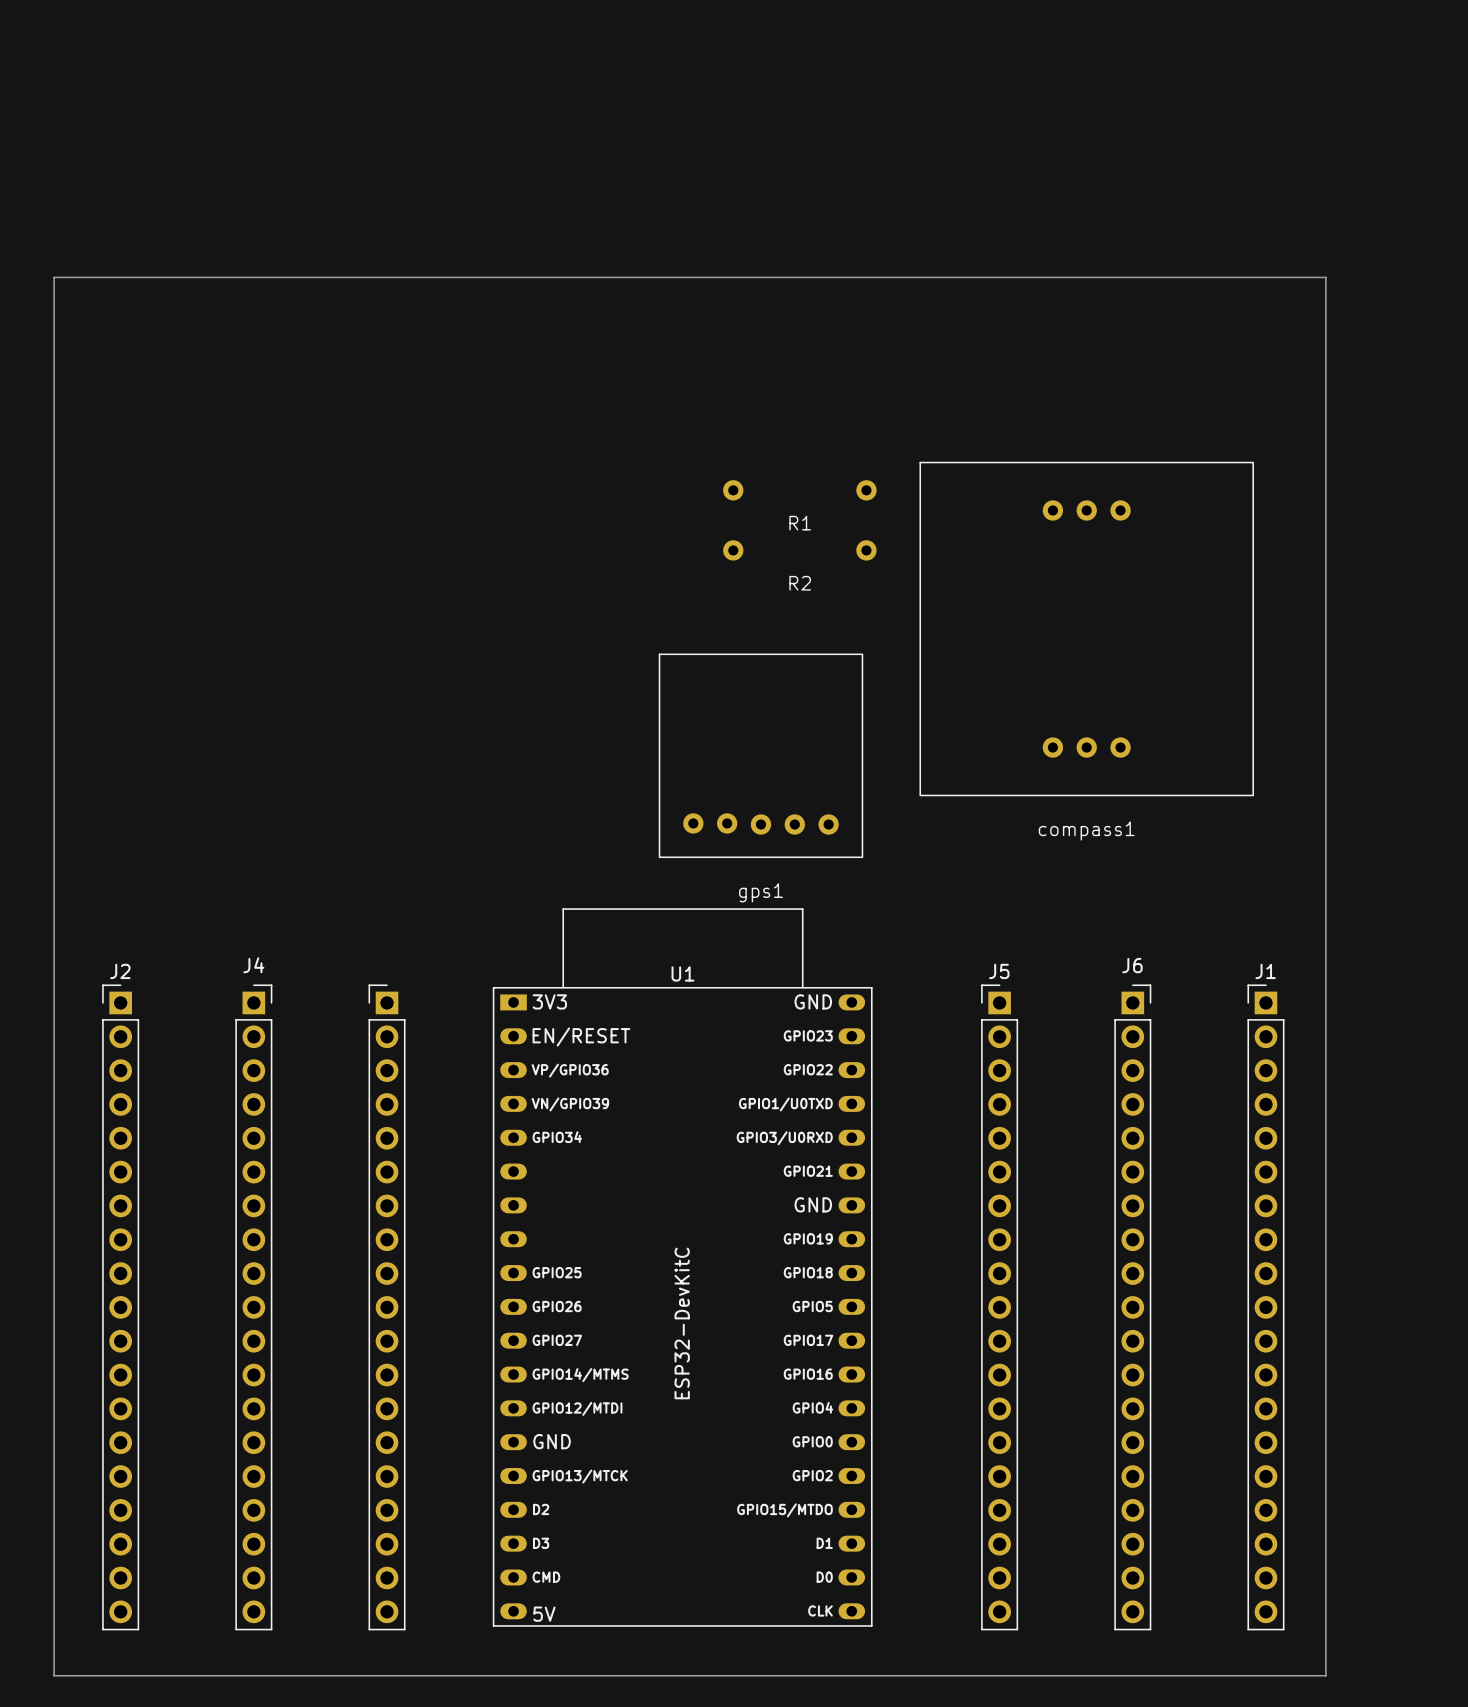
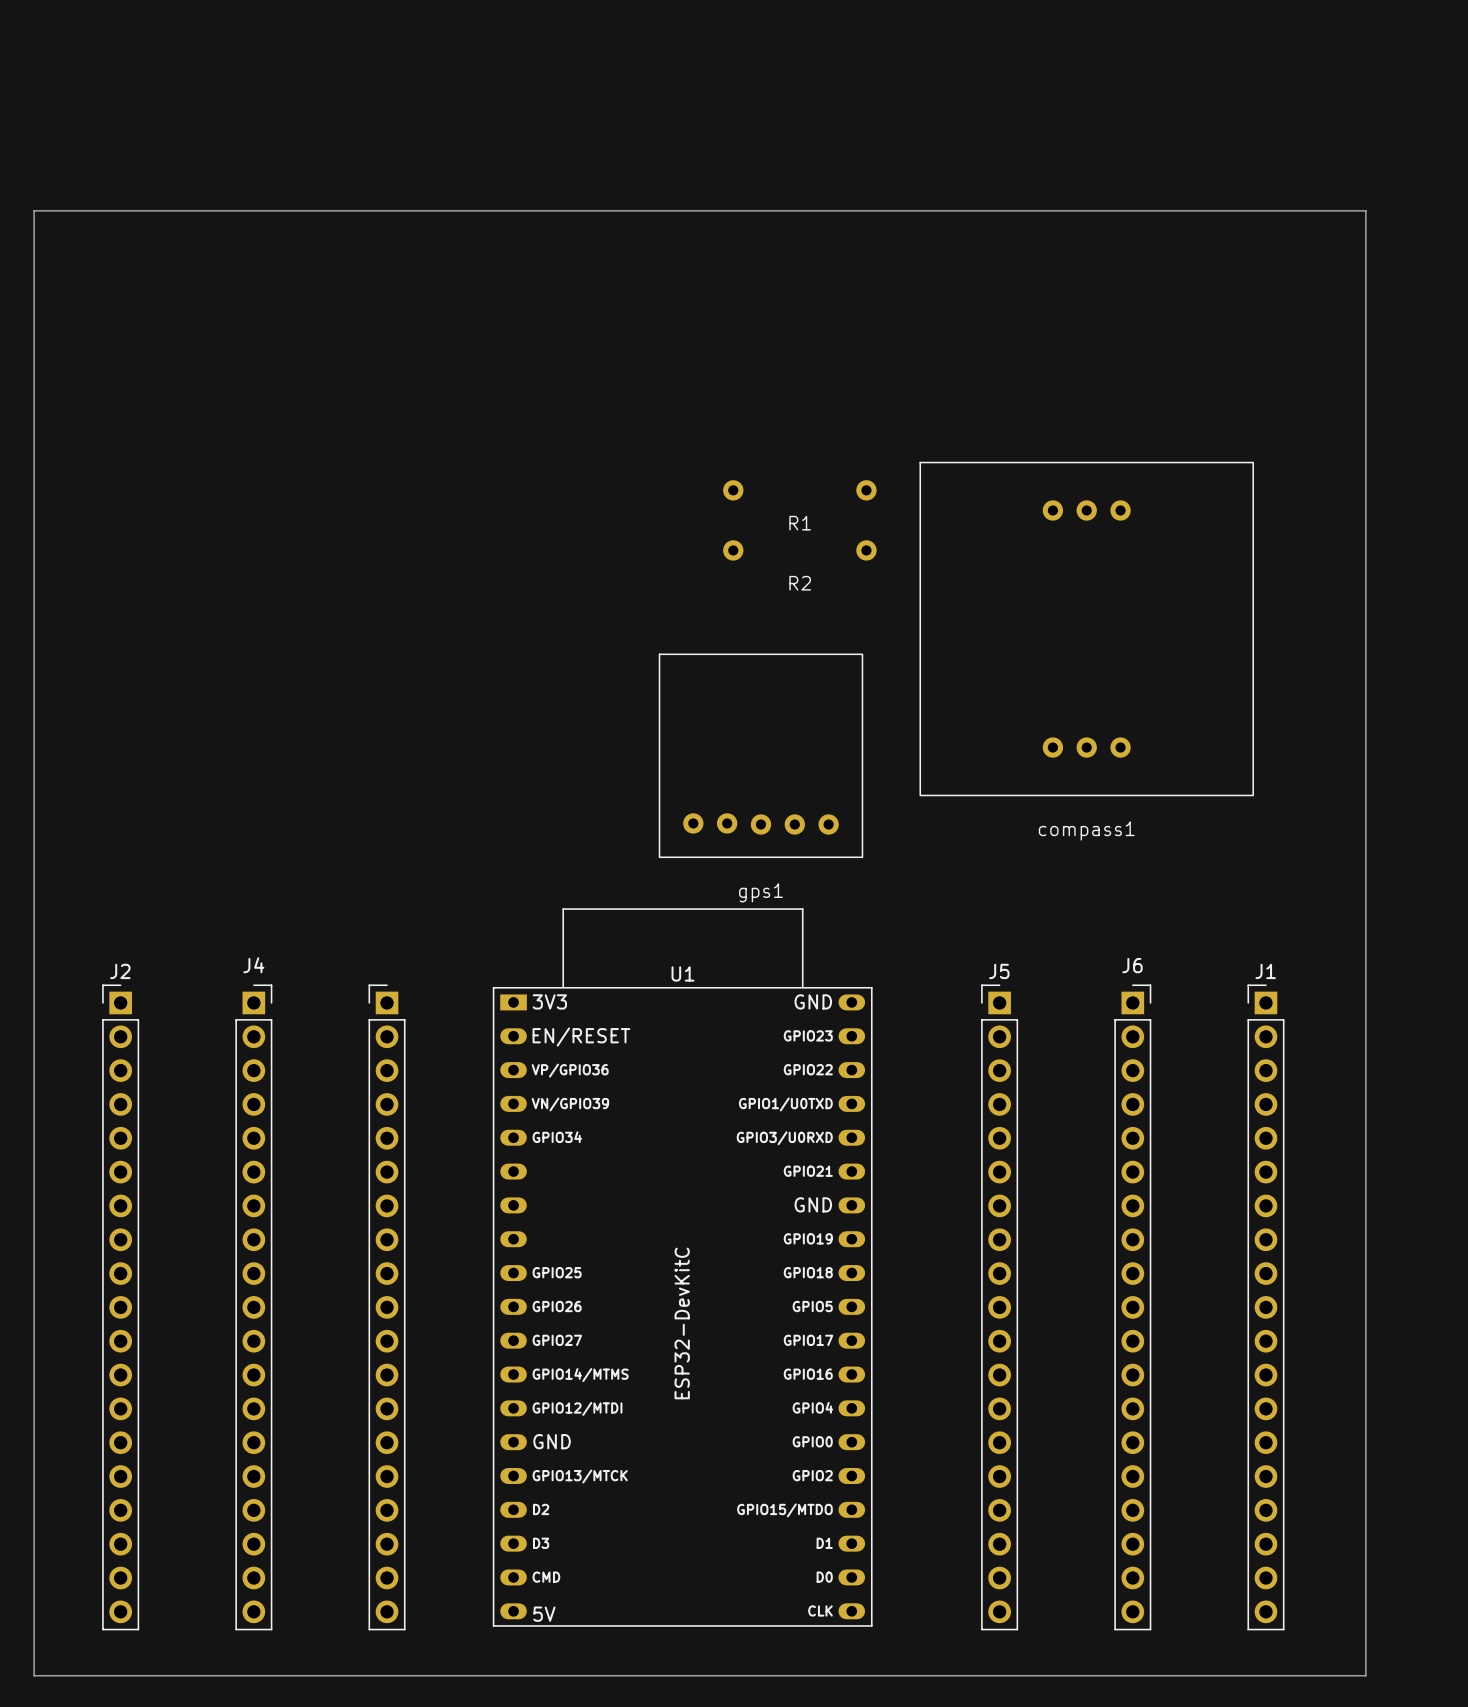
board edge: (54, 1675) (54, 277) (1325, 277) (1325, 1675) -> (54, 1675) (34, 1675) (34, 210) (1365, 210) (1365, 1675) (1325, 1675)

